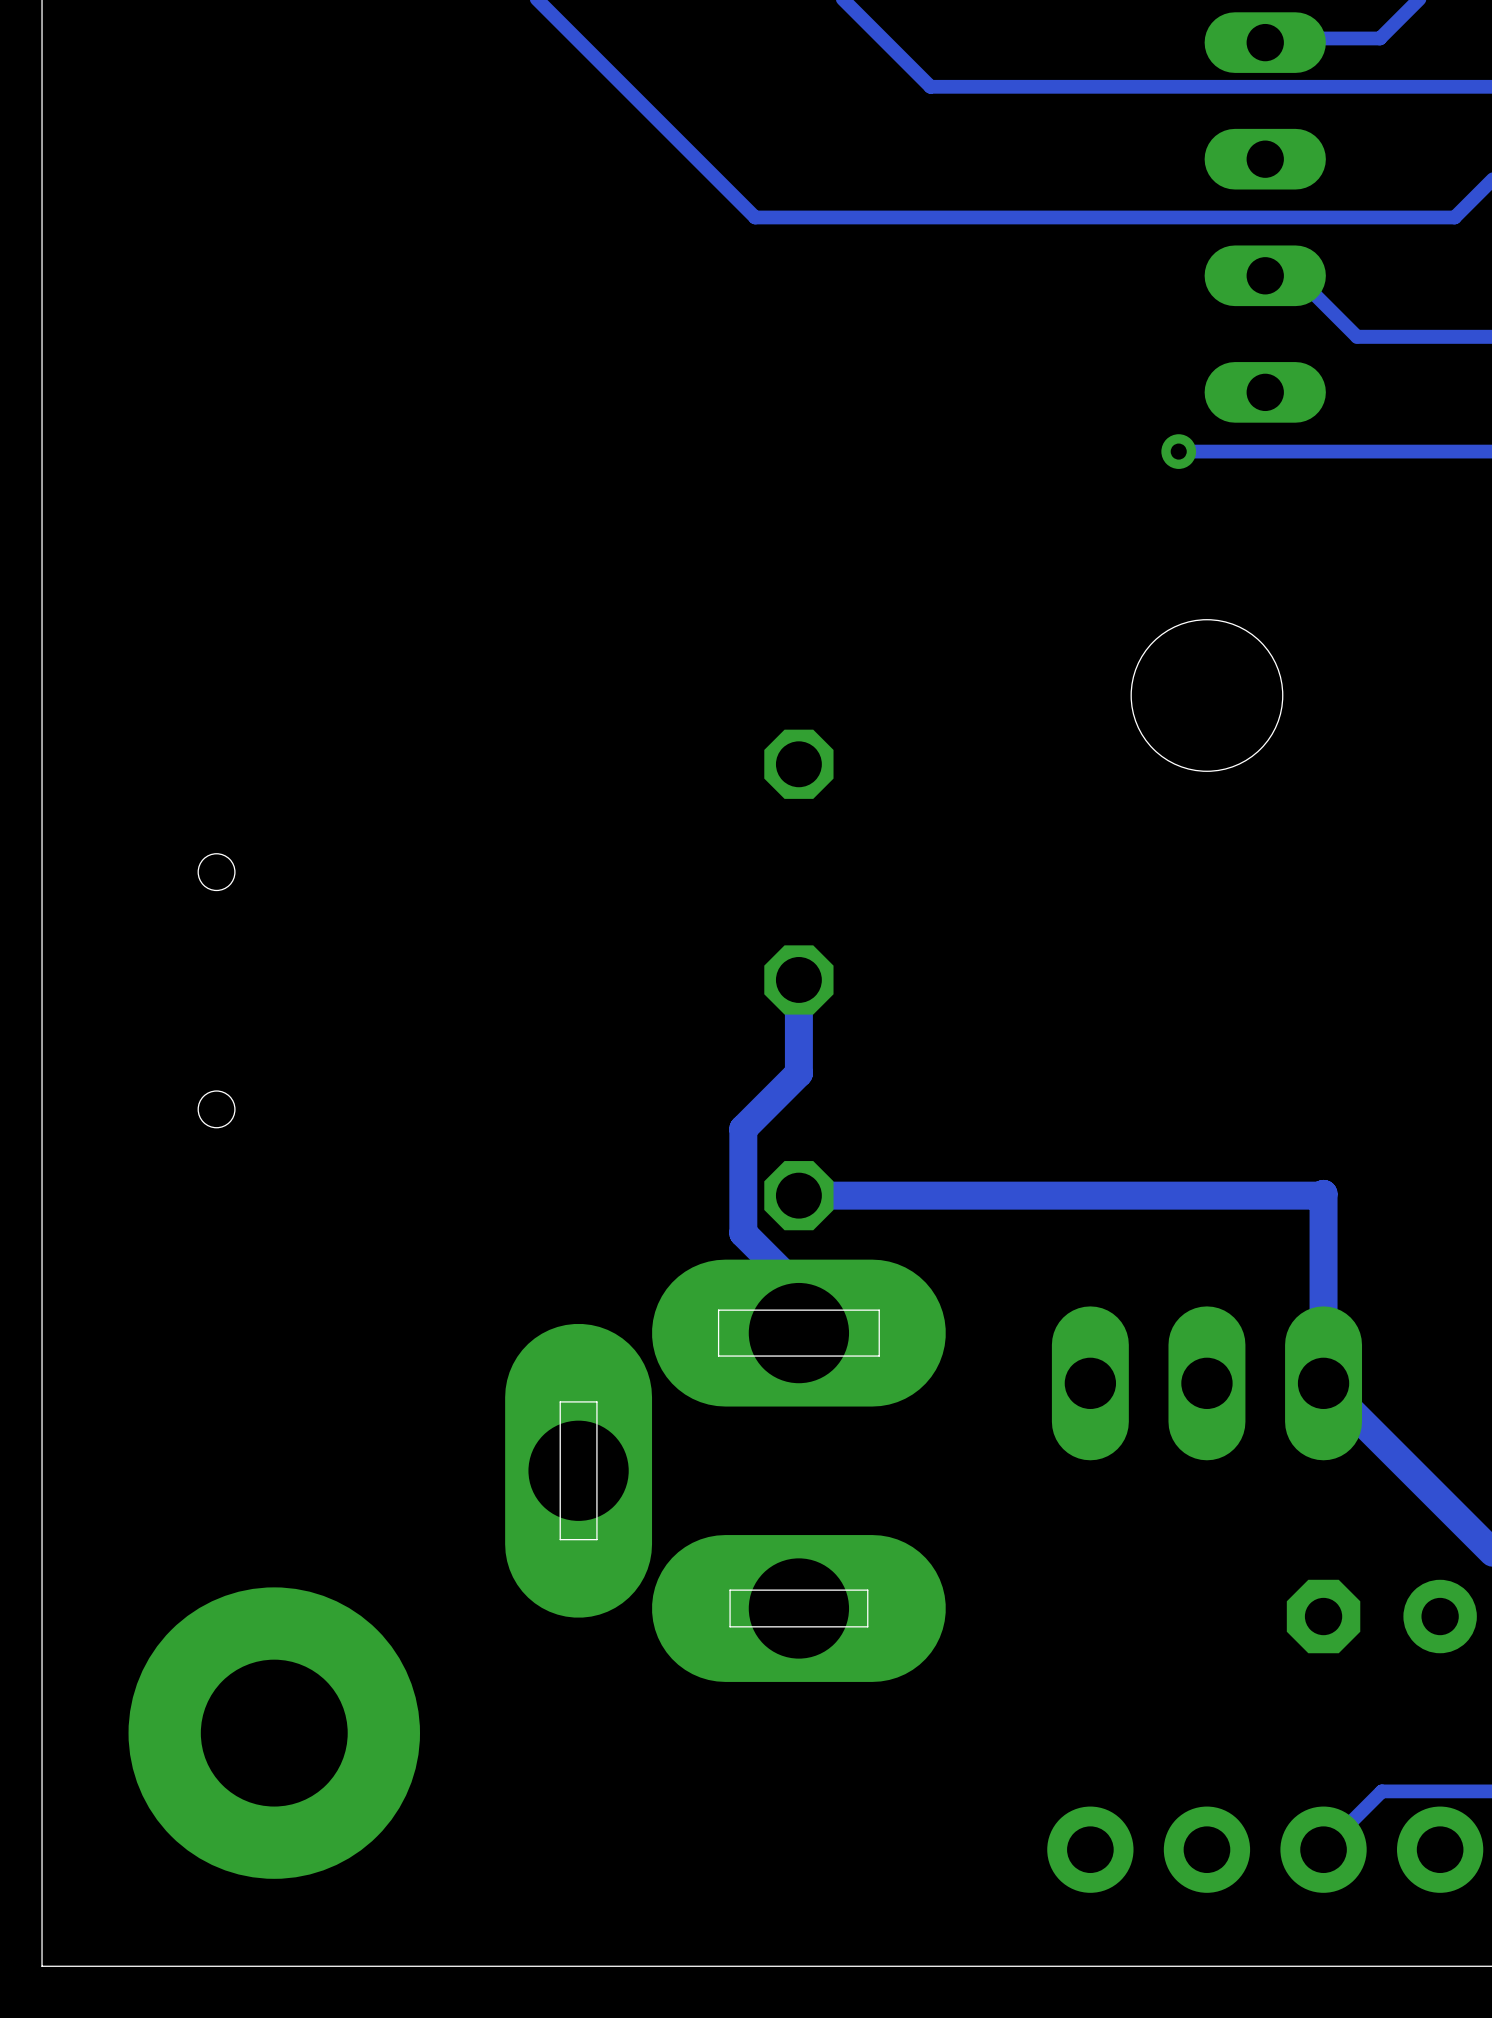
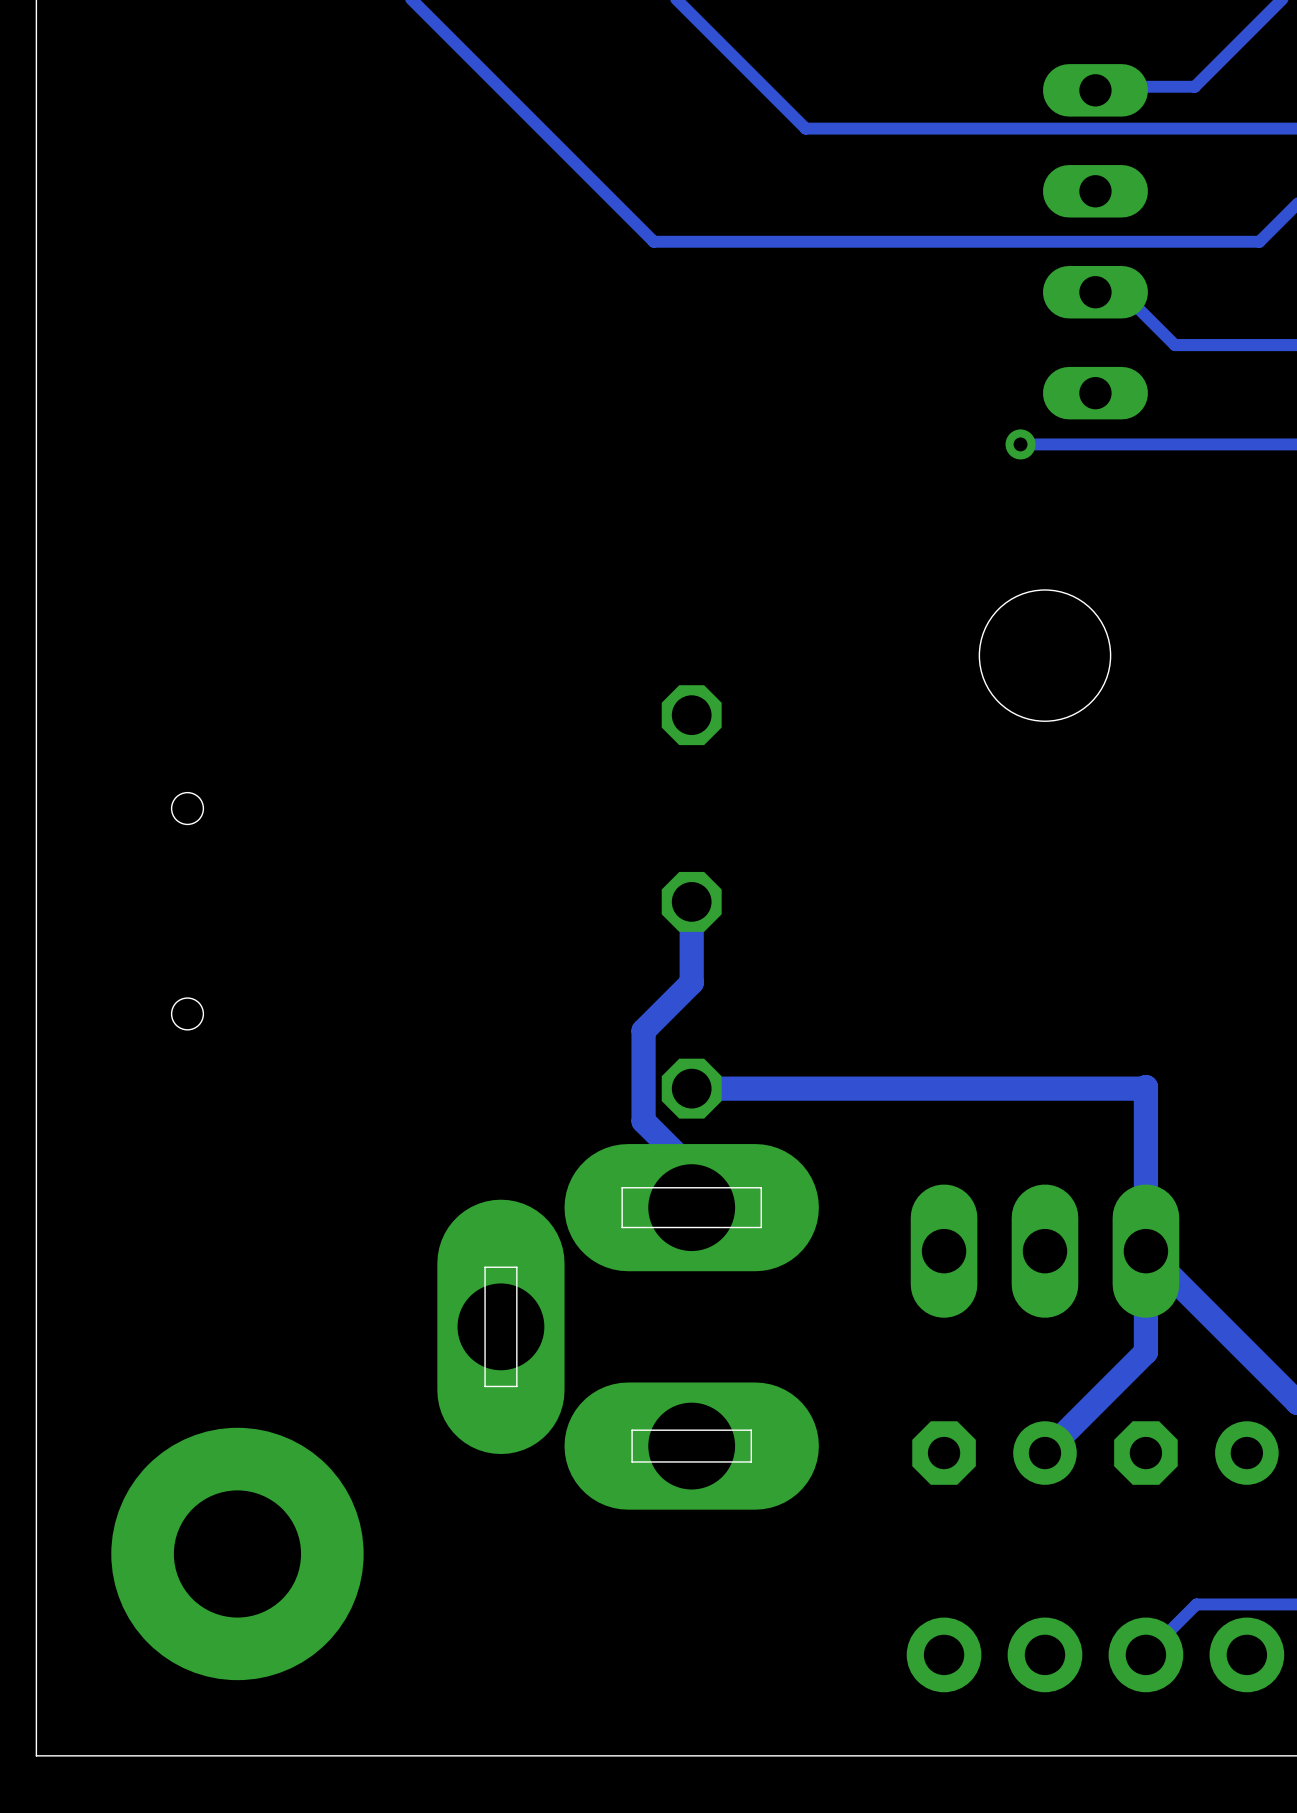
track: none -> (1145, 1251) (1145, 1352) (1044, 1453)
part: none -> (994, 1453)

